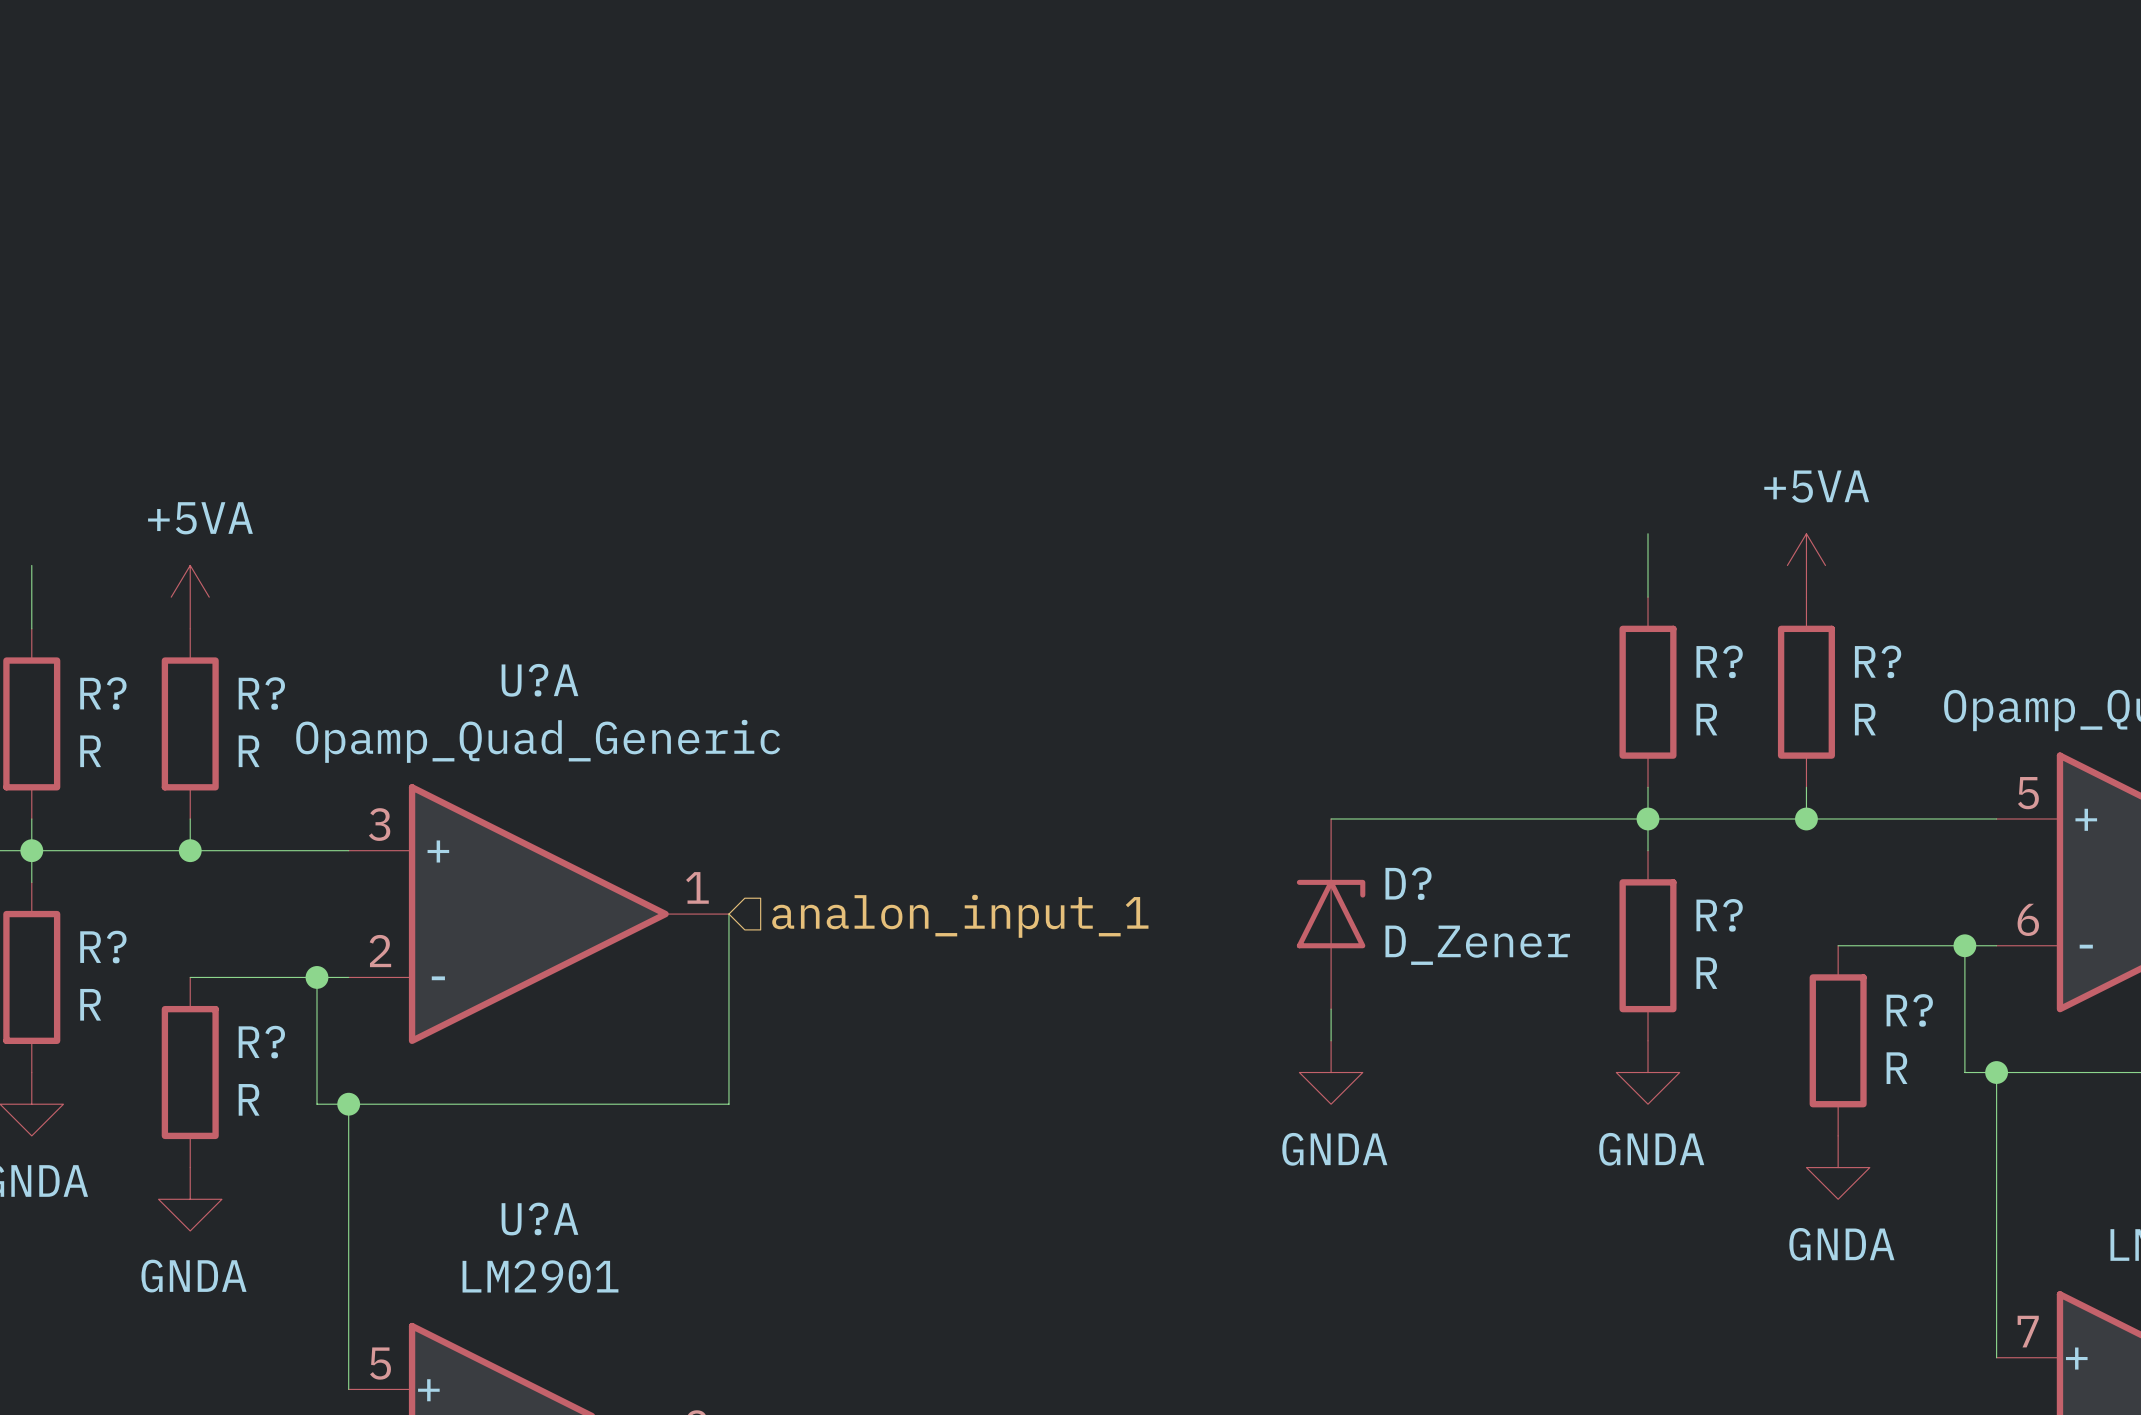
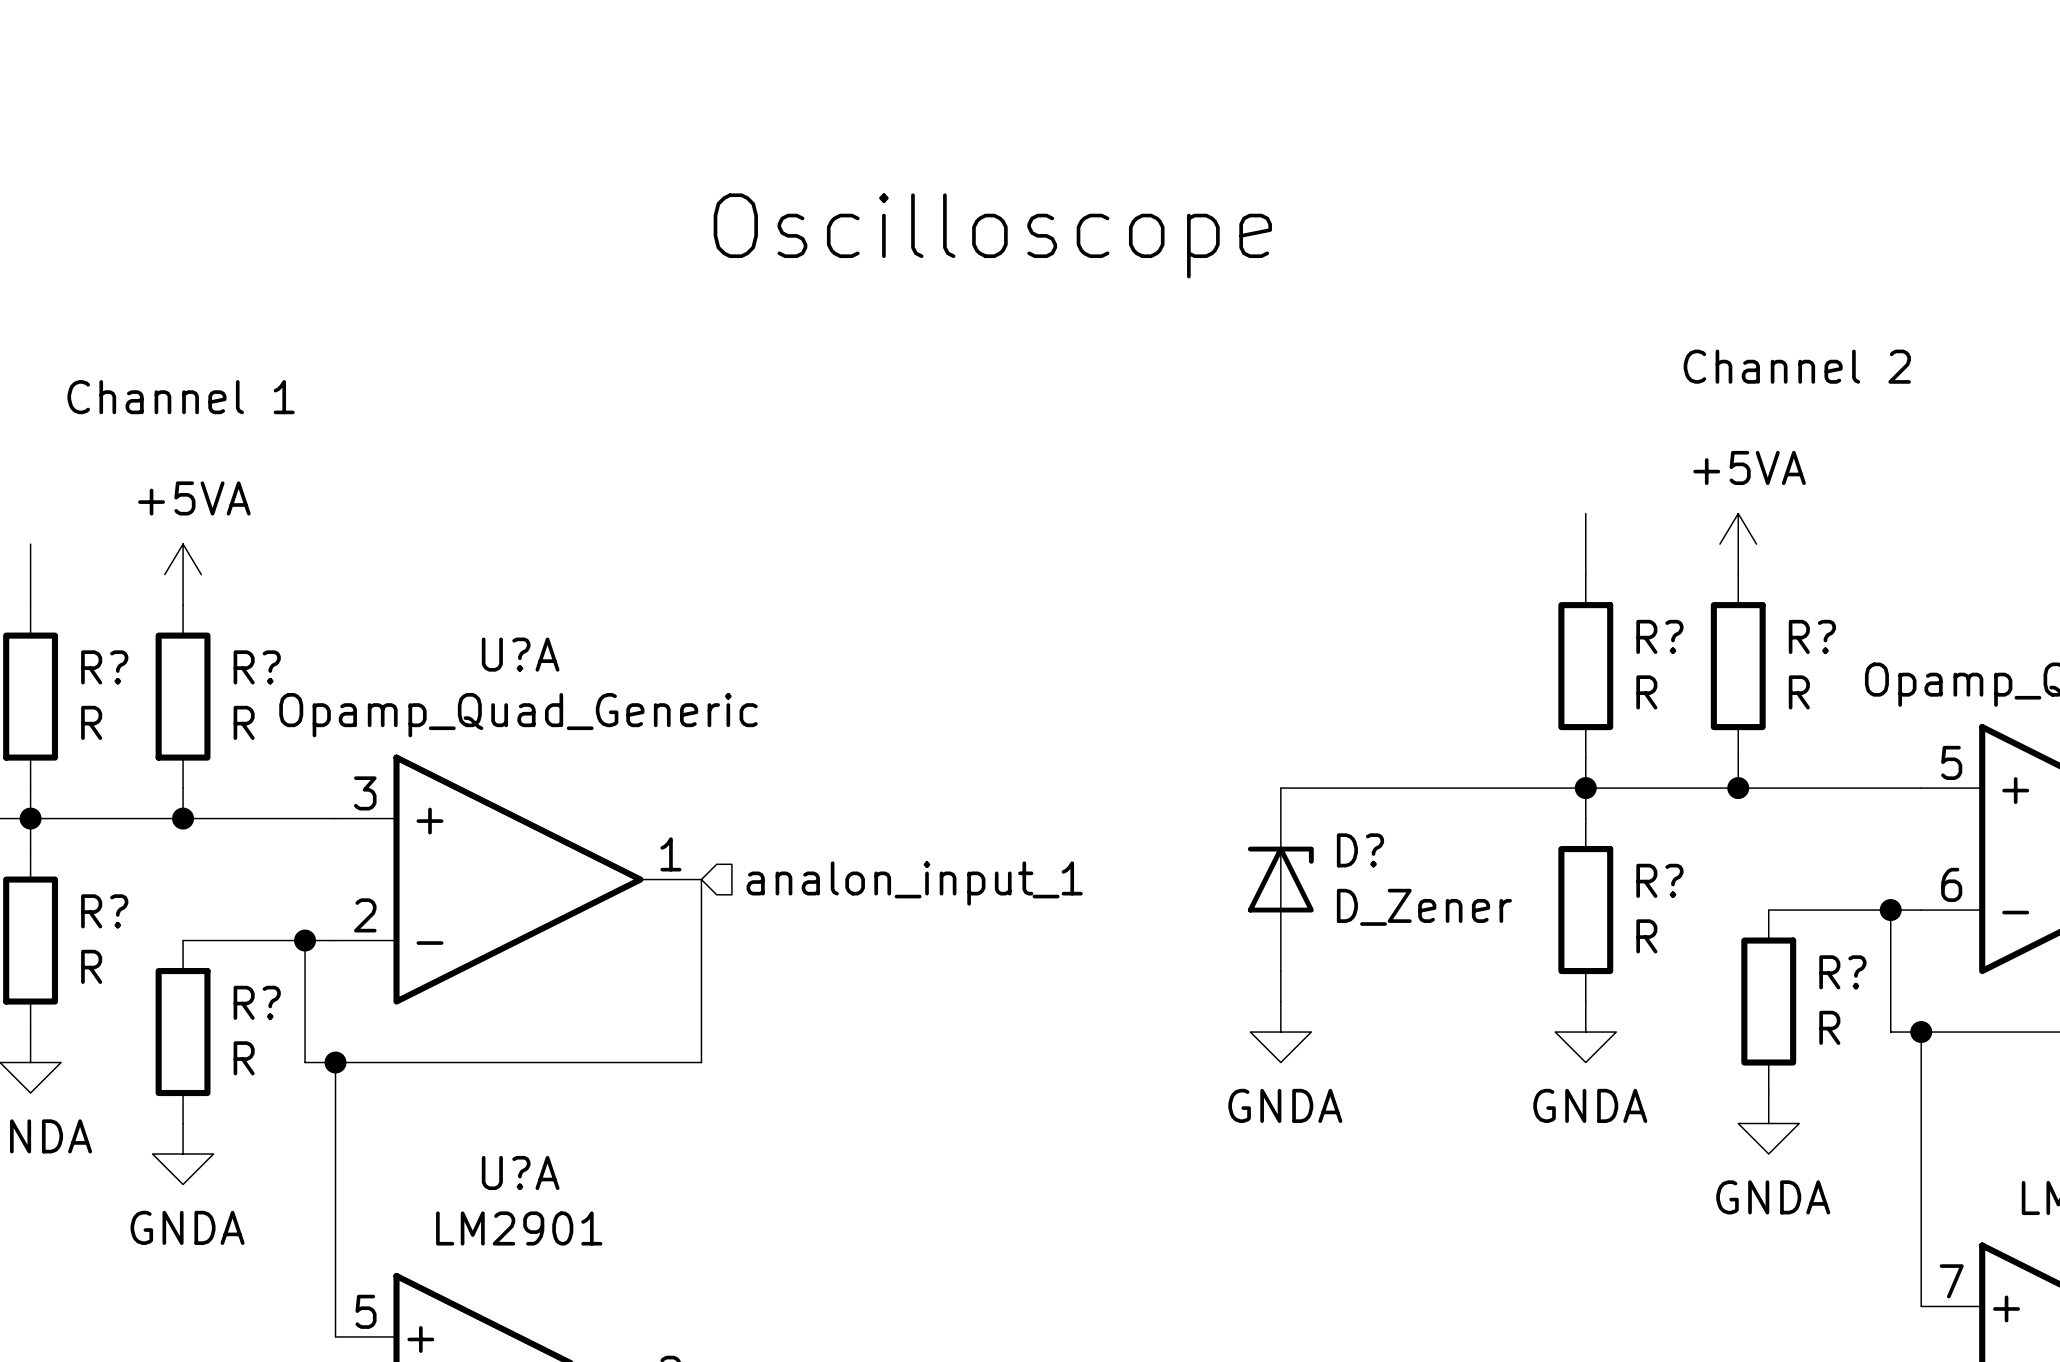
text: none -> Oscilloscope (992, 235)
text: none -> Channel 2 (1797, 366)
text: none -> Channel 1 (181, 397)

